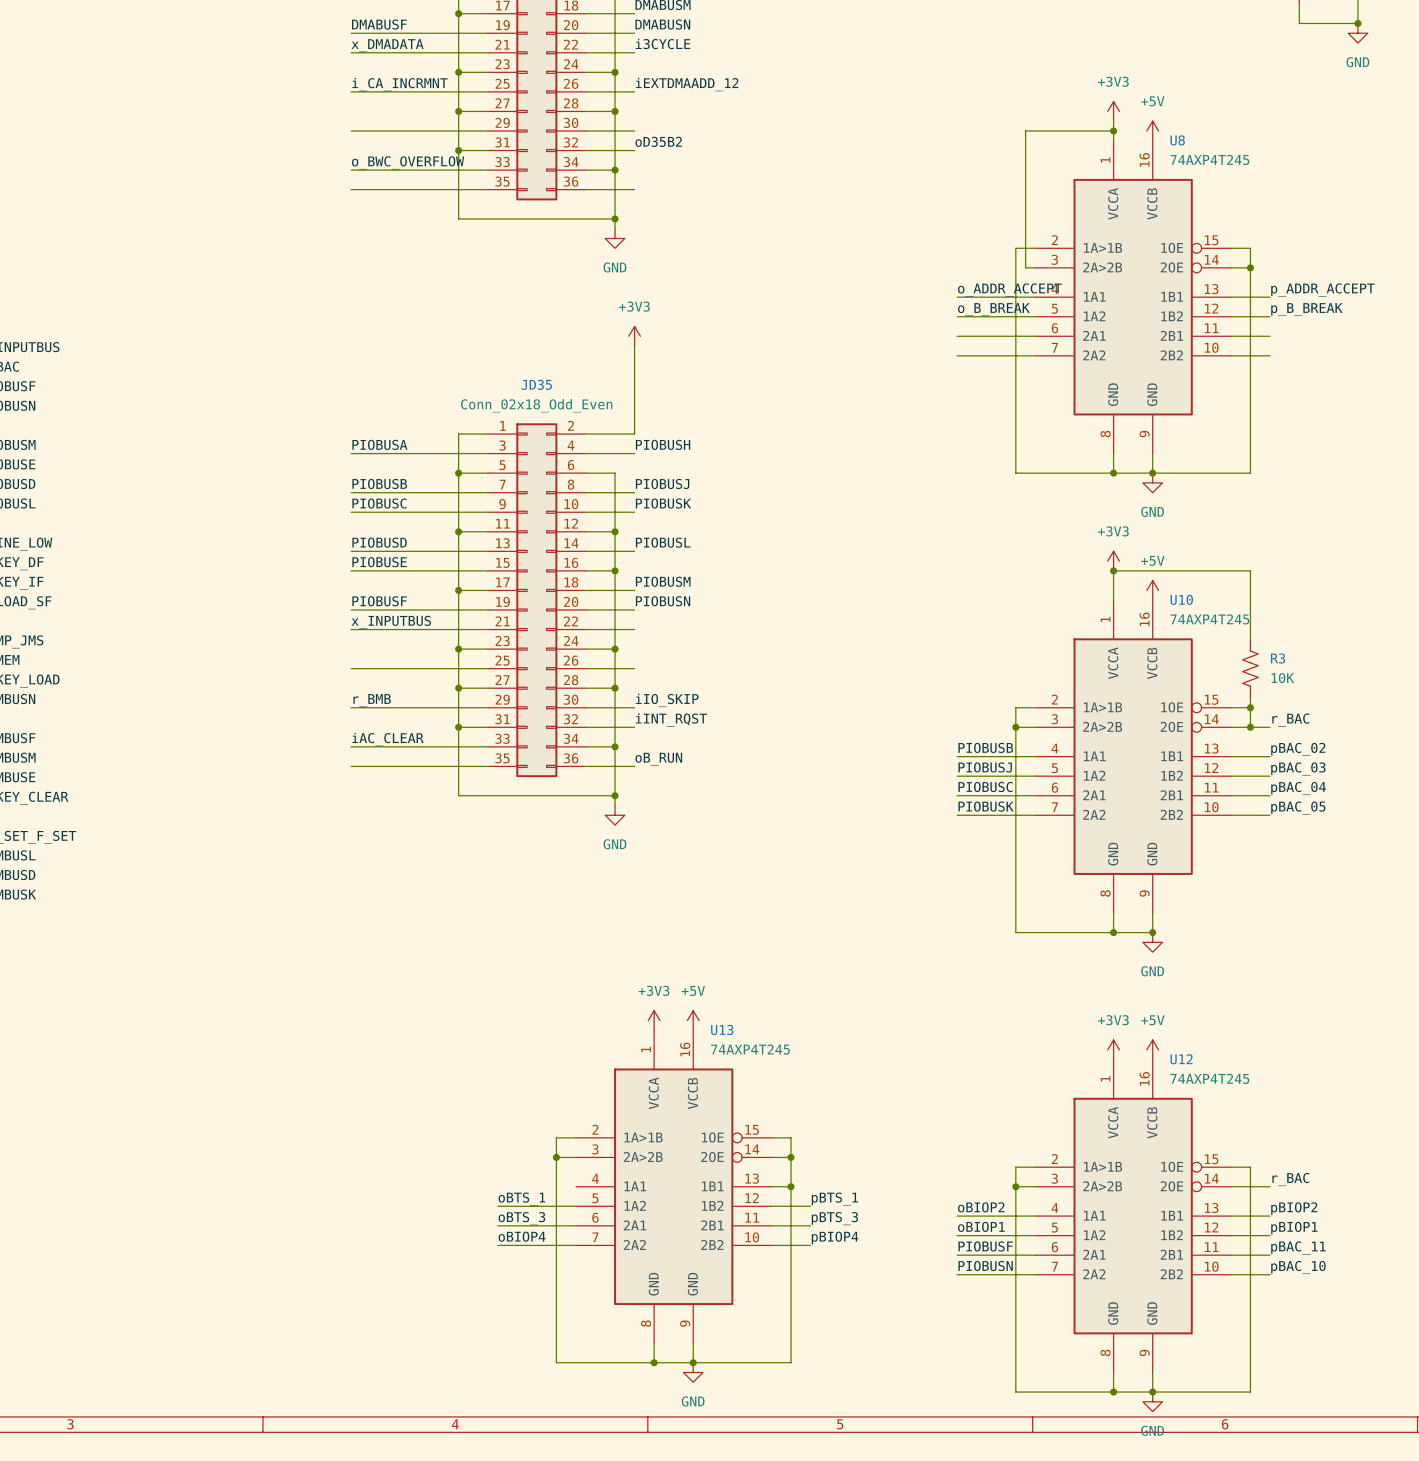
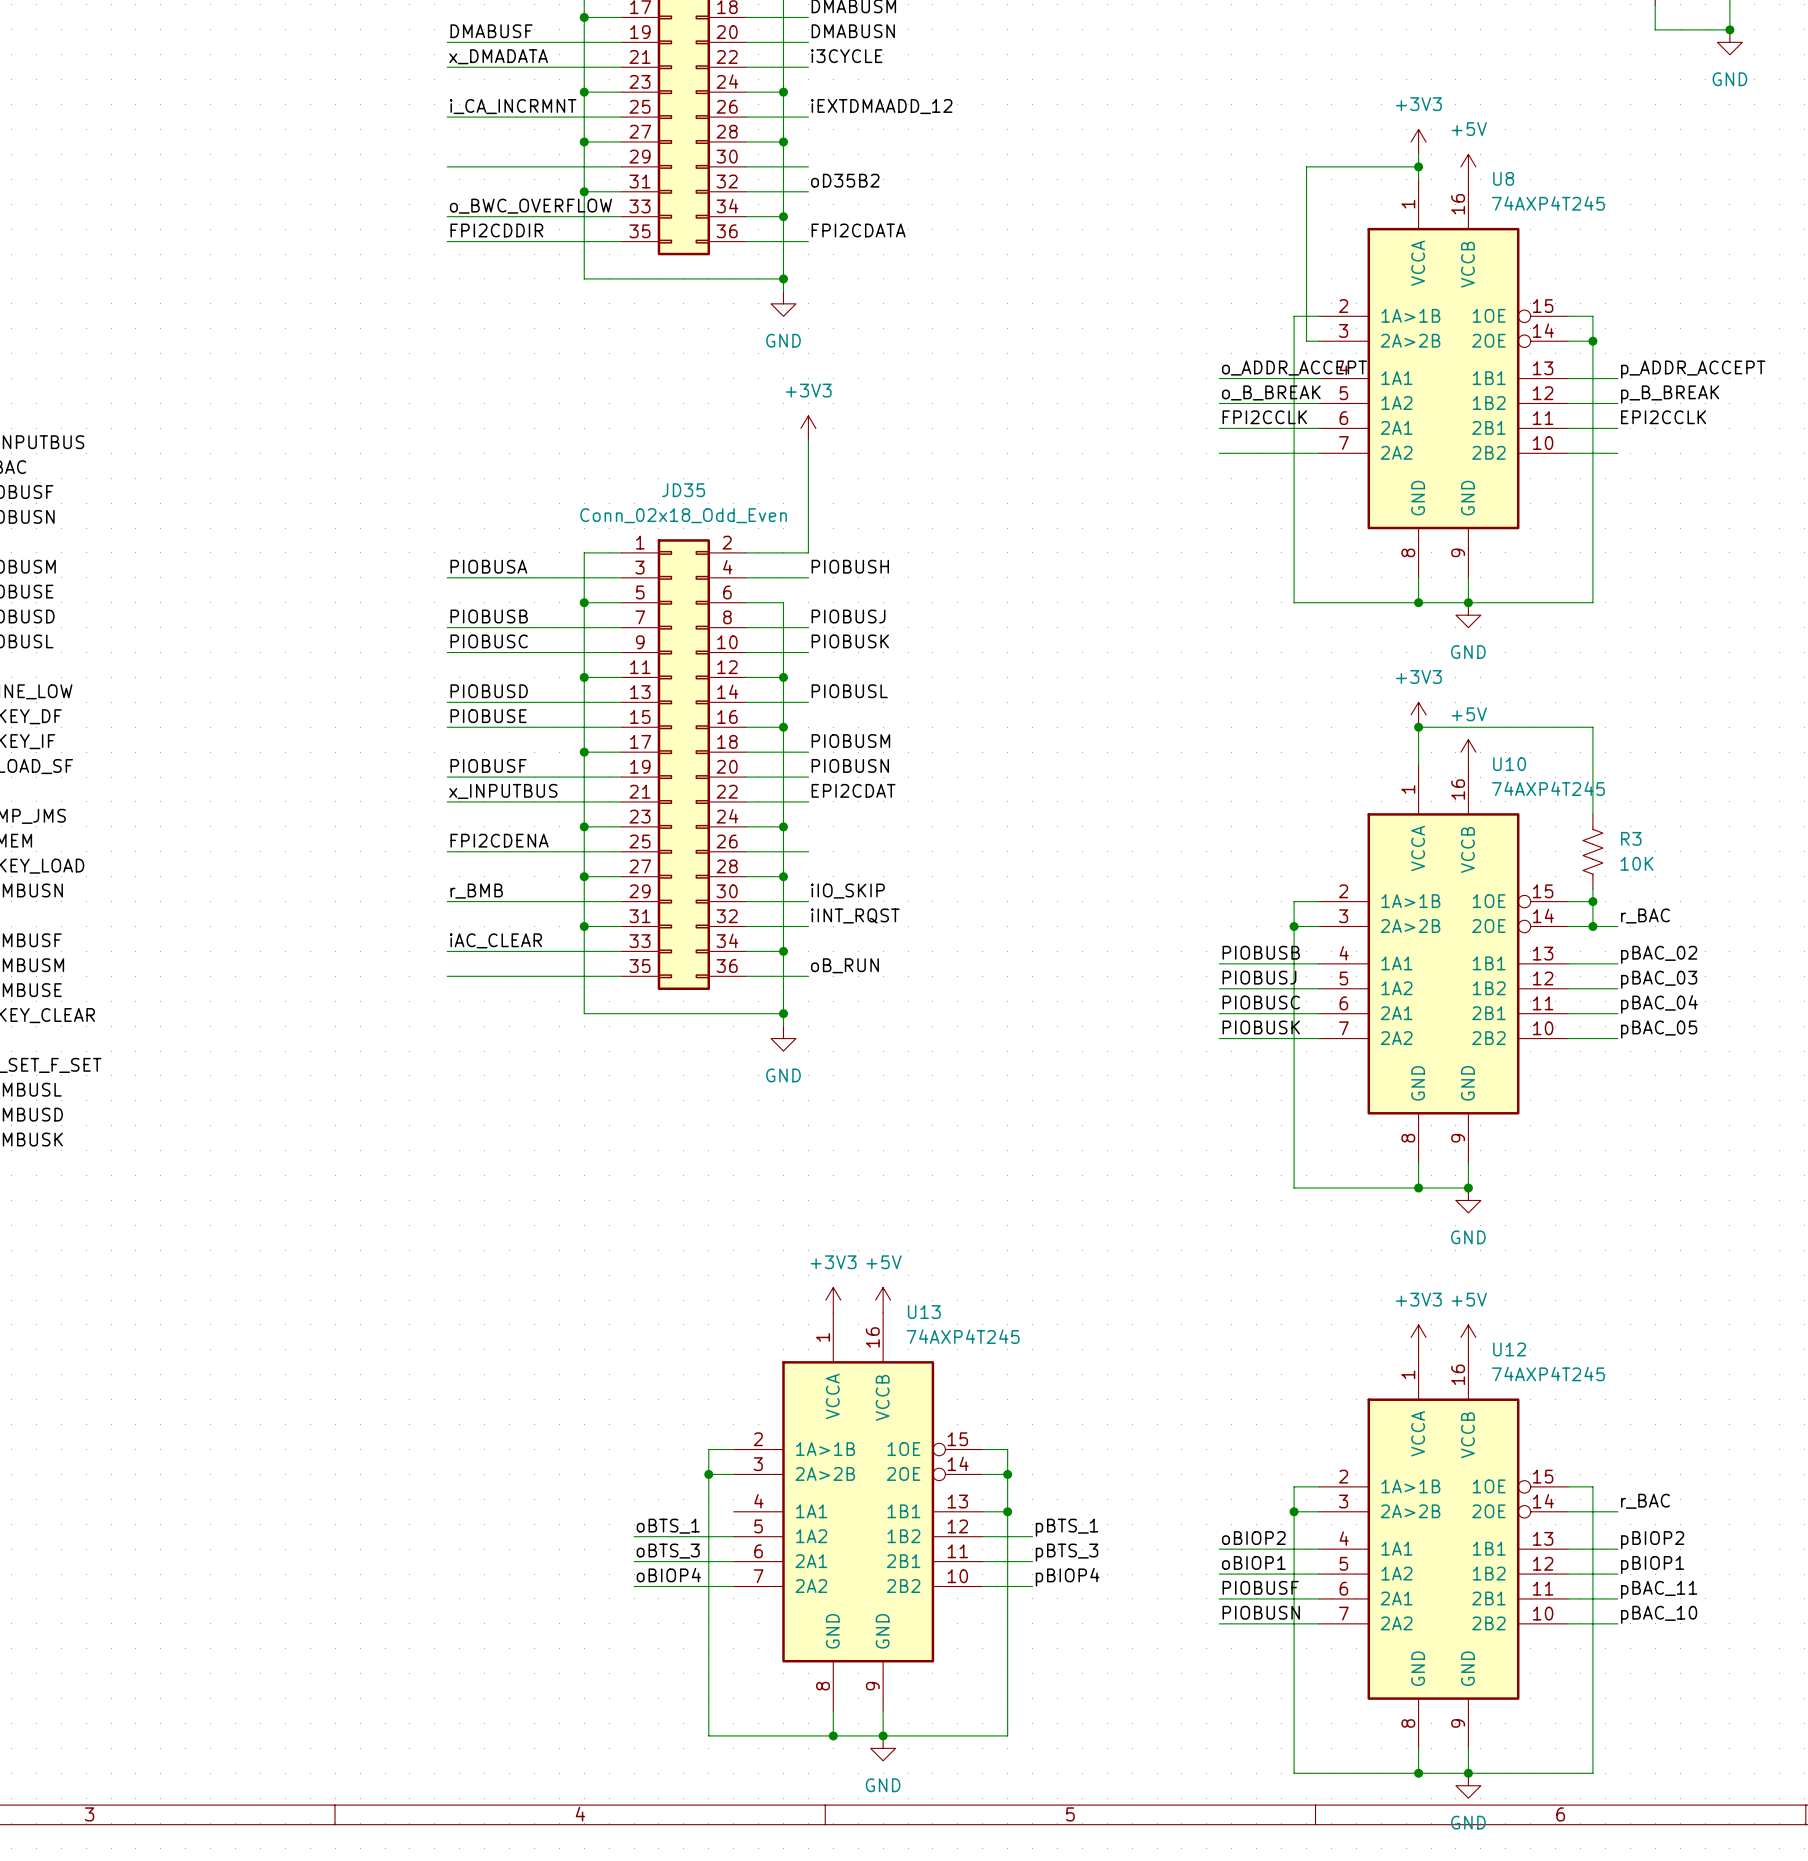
label: none -> FPI2CDDIR (496, 230)
label: none -> FPI2CDATA (858, 230)
label: none -> FPI2CCLK (1264, 417)
label: none -> EPI2CCLK (1663, 417)
label: none -> EPI2CDAT (853, 790)
label: none -> FPI2CDENA (499, 840)

